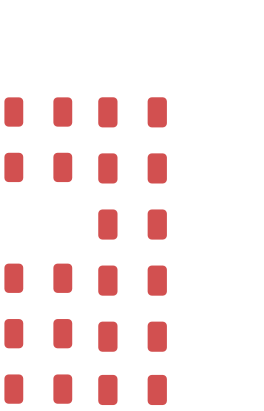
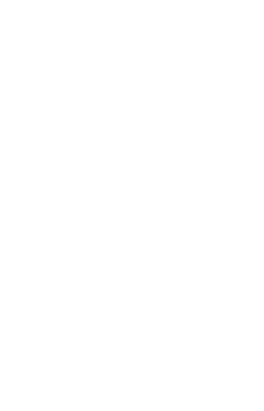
part: (38, 112) -> none
part: (132, 112) -> none
part: (38, 167) -> none
part: (132, 168) -> none
part: (132, 224) -> none
part: (38, 278) -> none
part: (132, 280) -> none
part: (38, 333) -> none
part: (132, 336) -> none
part: (38, 389) -> none
part: (132, 389) -> none

